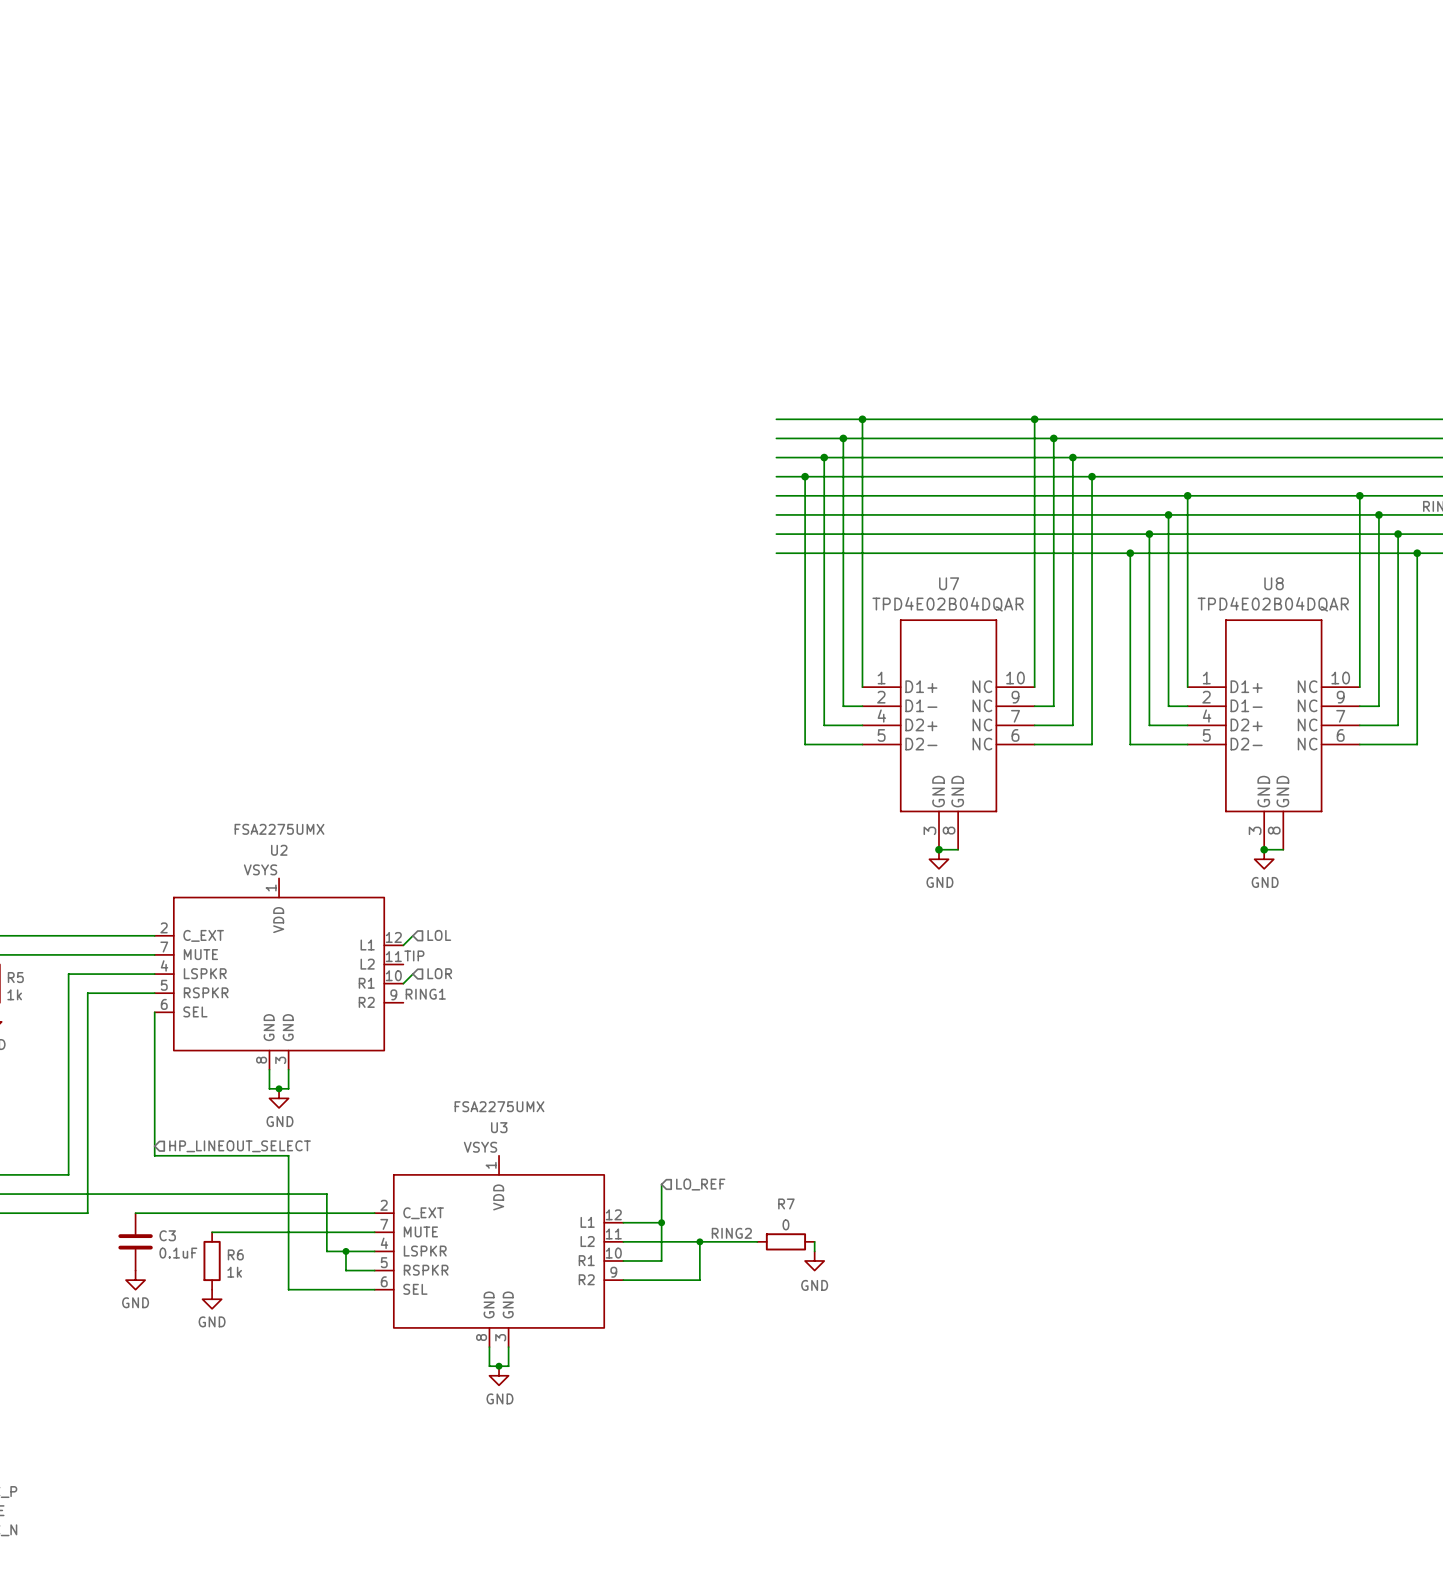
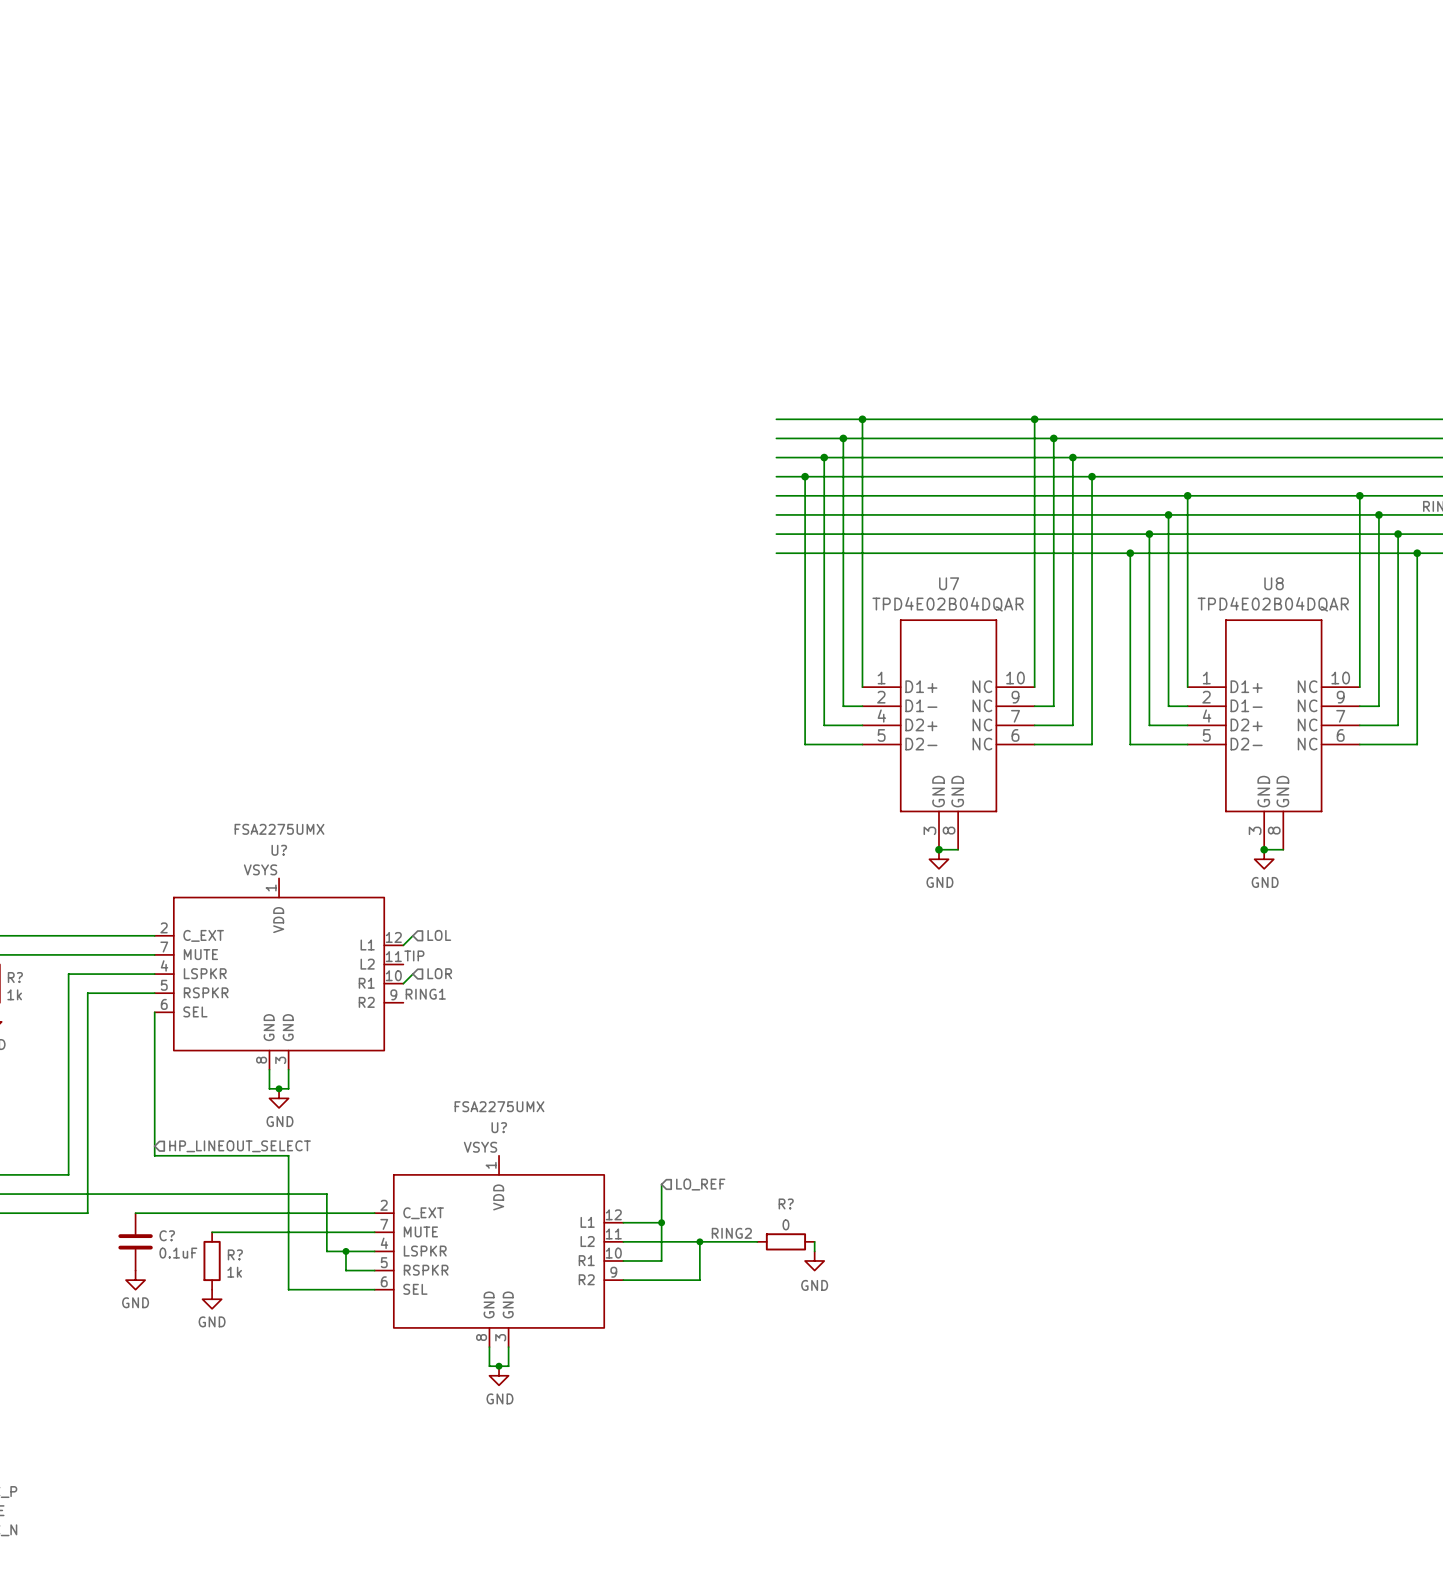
U2 name: U2 (279, 850) -> U? (279, 850)
R5 name: R5 (15, 977) -> R? (15, 977)
U3 name: U3 (499, 1127) -> U? (499, 1127)
R7 name: R7 (786, 1203) -> R? (786, 1203)
C3 name: C3 (167, 1235) -> C? (167, 1235)
R6 name: R6 (235, 1254) -> R? (235, 1254)

